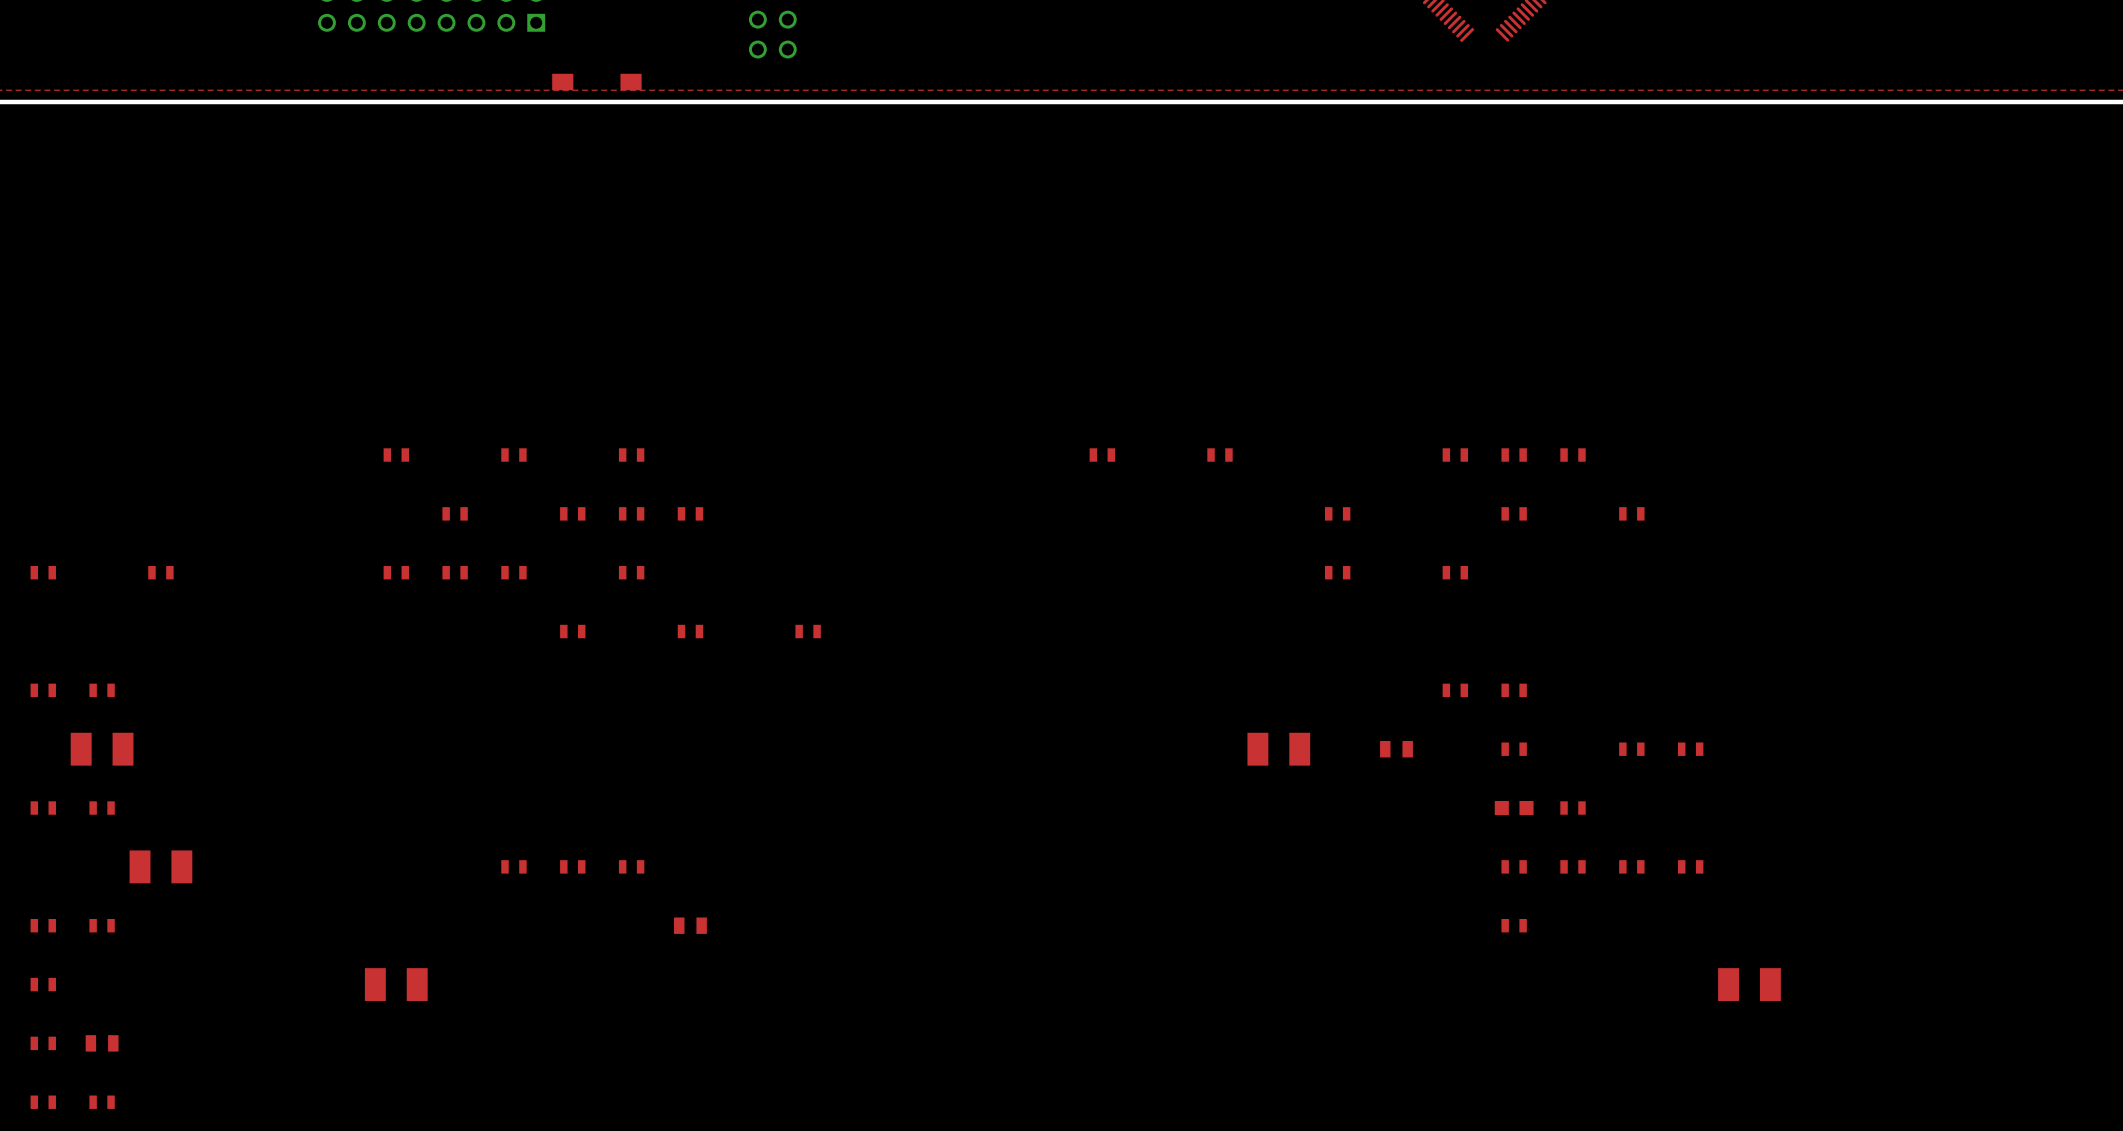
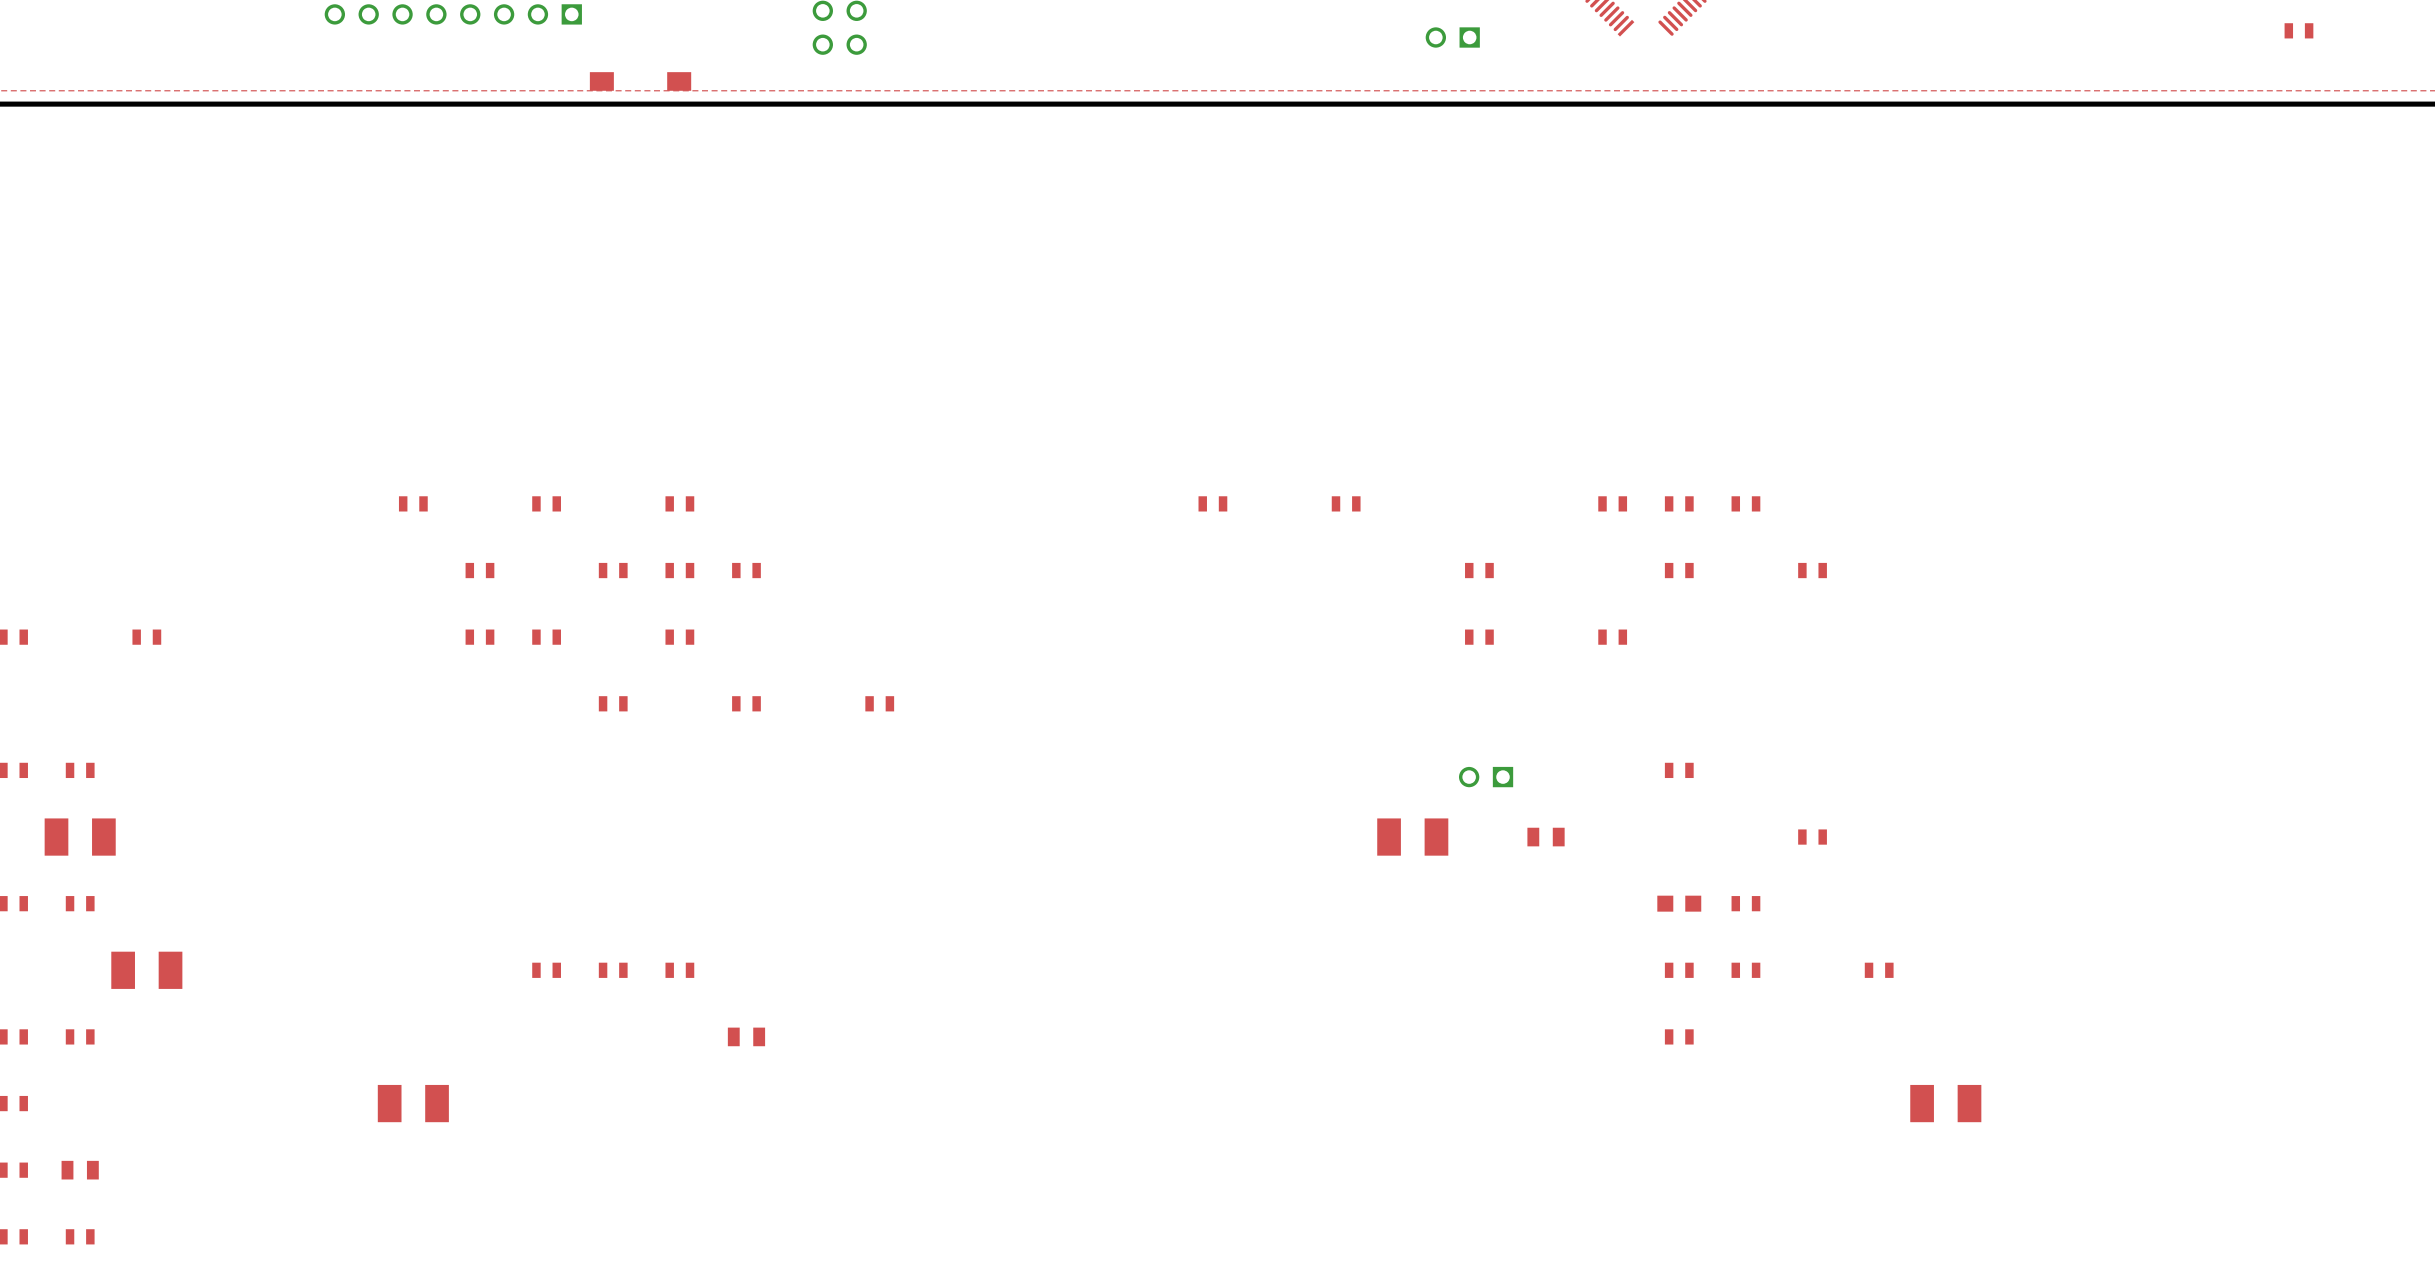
part: none -> (2298, 30)
part: none -> (1452, 37)
part: (396, 572) -> none
part: (1455, 690) -> none
part: none -> (1486, 777)
part: (1514, 749) -> none
part: (1690, 749) -> none
part: (1631, 866) -> none

